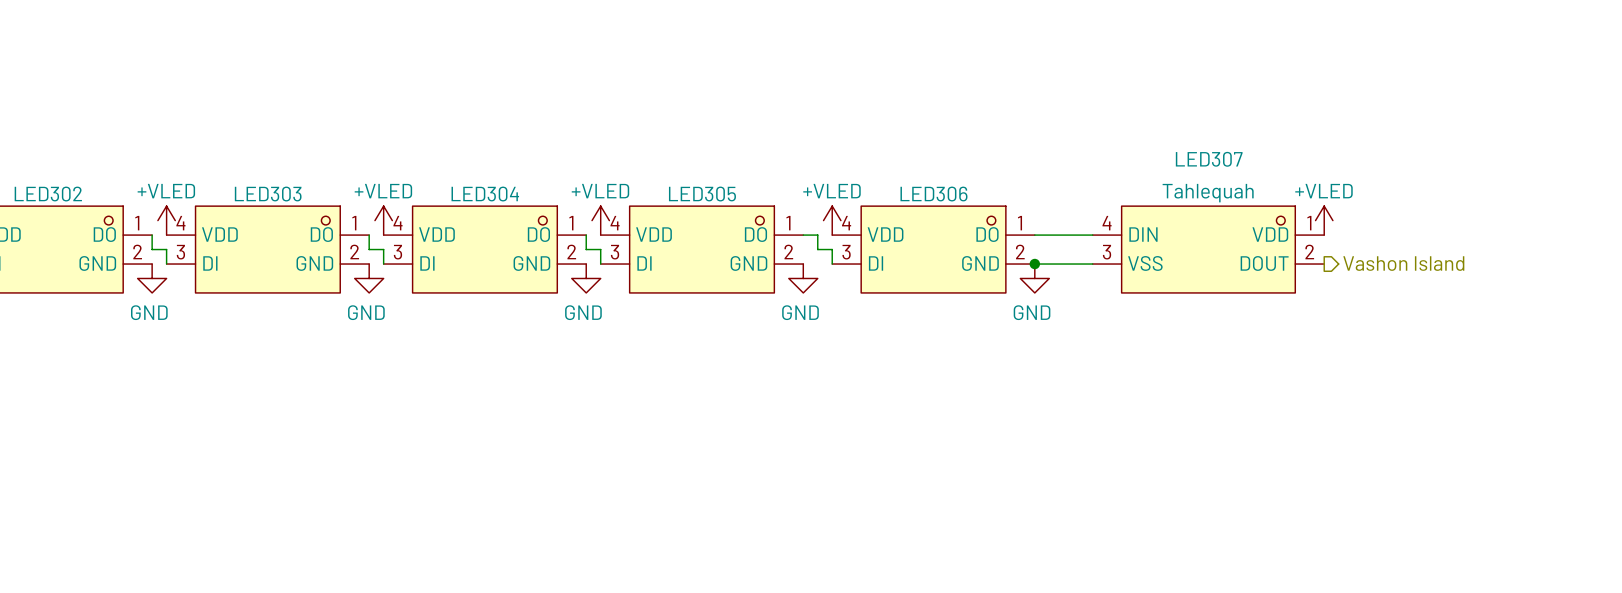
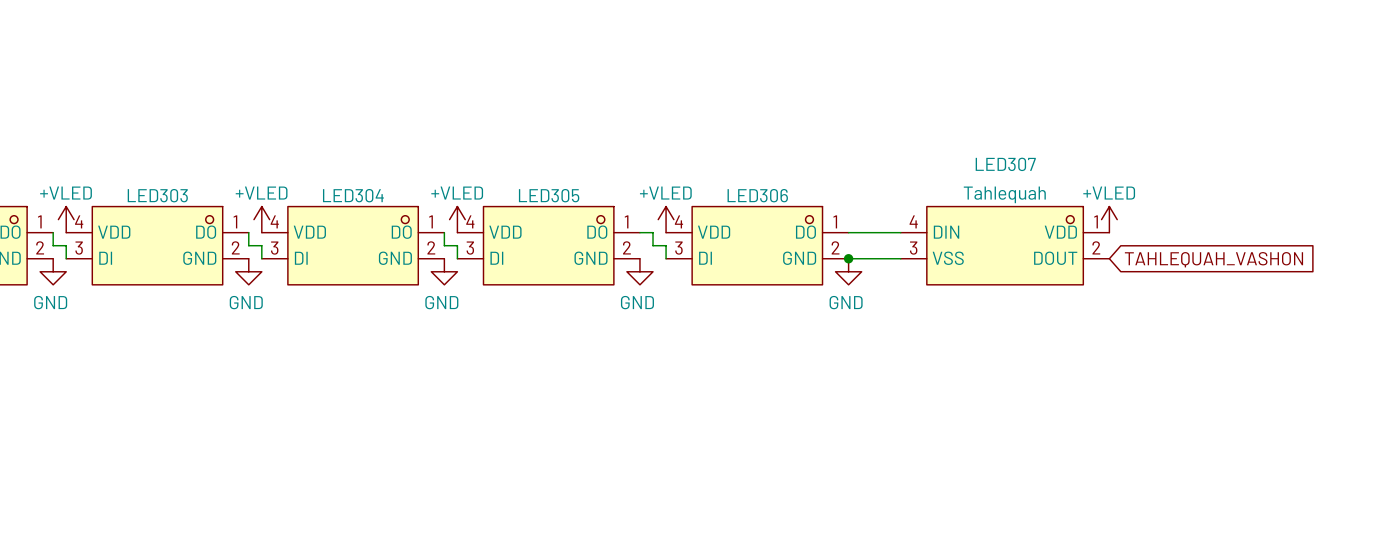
hierarchical label: Vashon Island (1403, 263) -> none
global label: none -> TAHLEQUAH_VASHON (1213, 259)

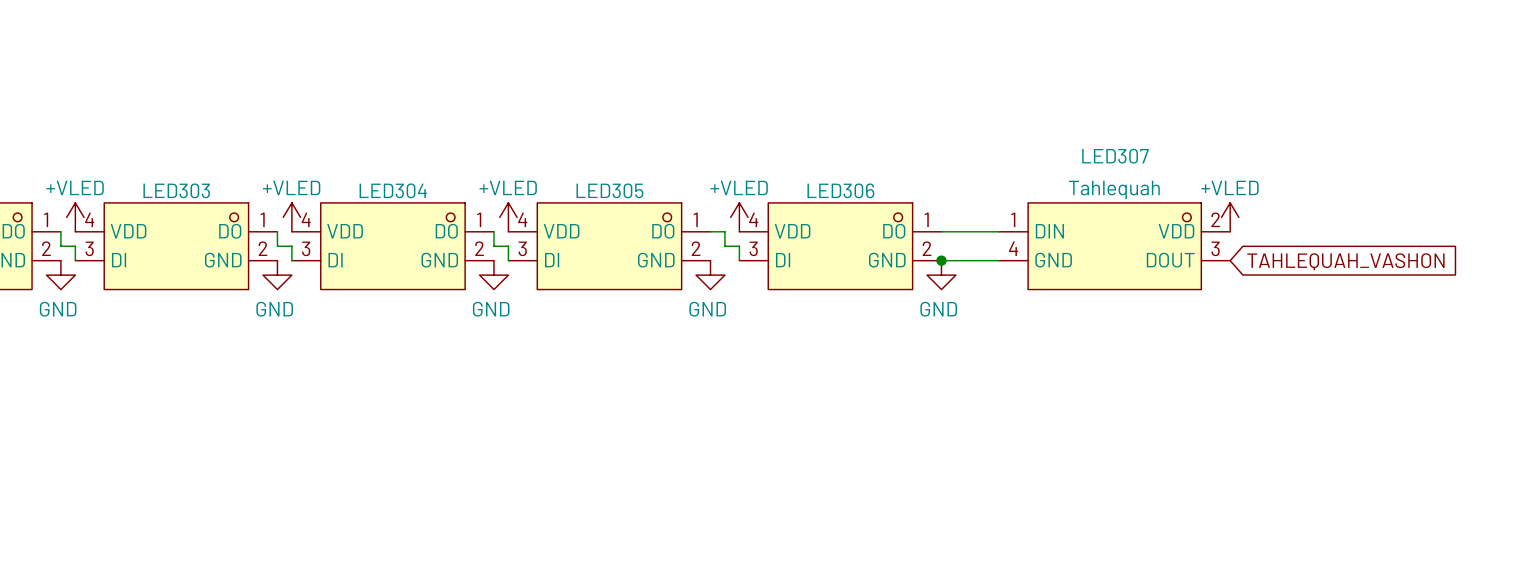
LED307 pin number: 4 (913, 221) -> 1 (1013, 219)
LED307 pin number: 1 (1096, 221) -> 2 (1215, 219)
LED307 pin number: 2 (1096, 247) -> 3 (1215, 248)
LED307 pin number: 3 (913, 248) -> 4 (1013, 248)
LED307 pin name: VSS (948, 258) -> GND (1053, 260)

